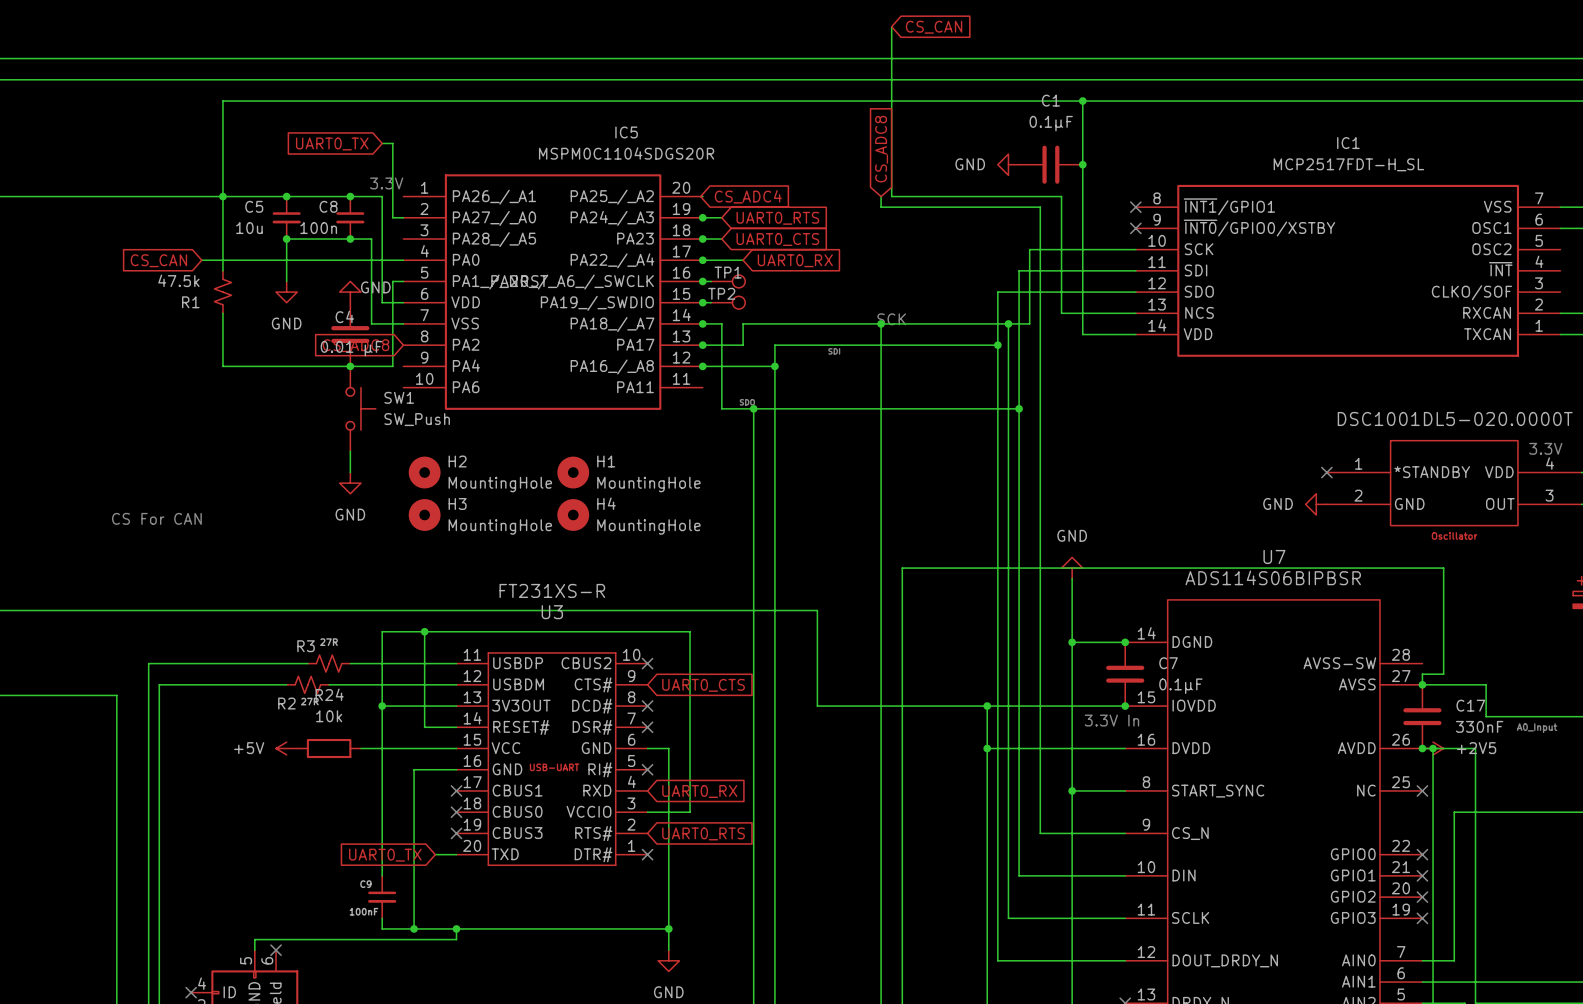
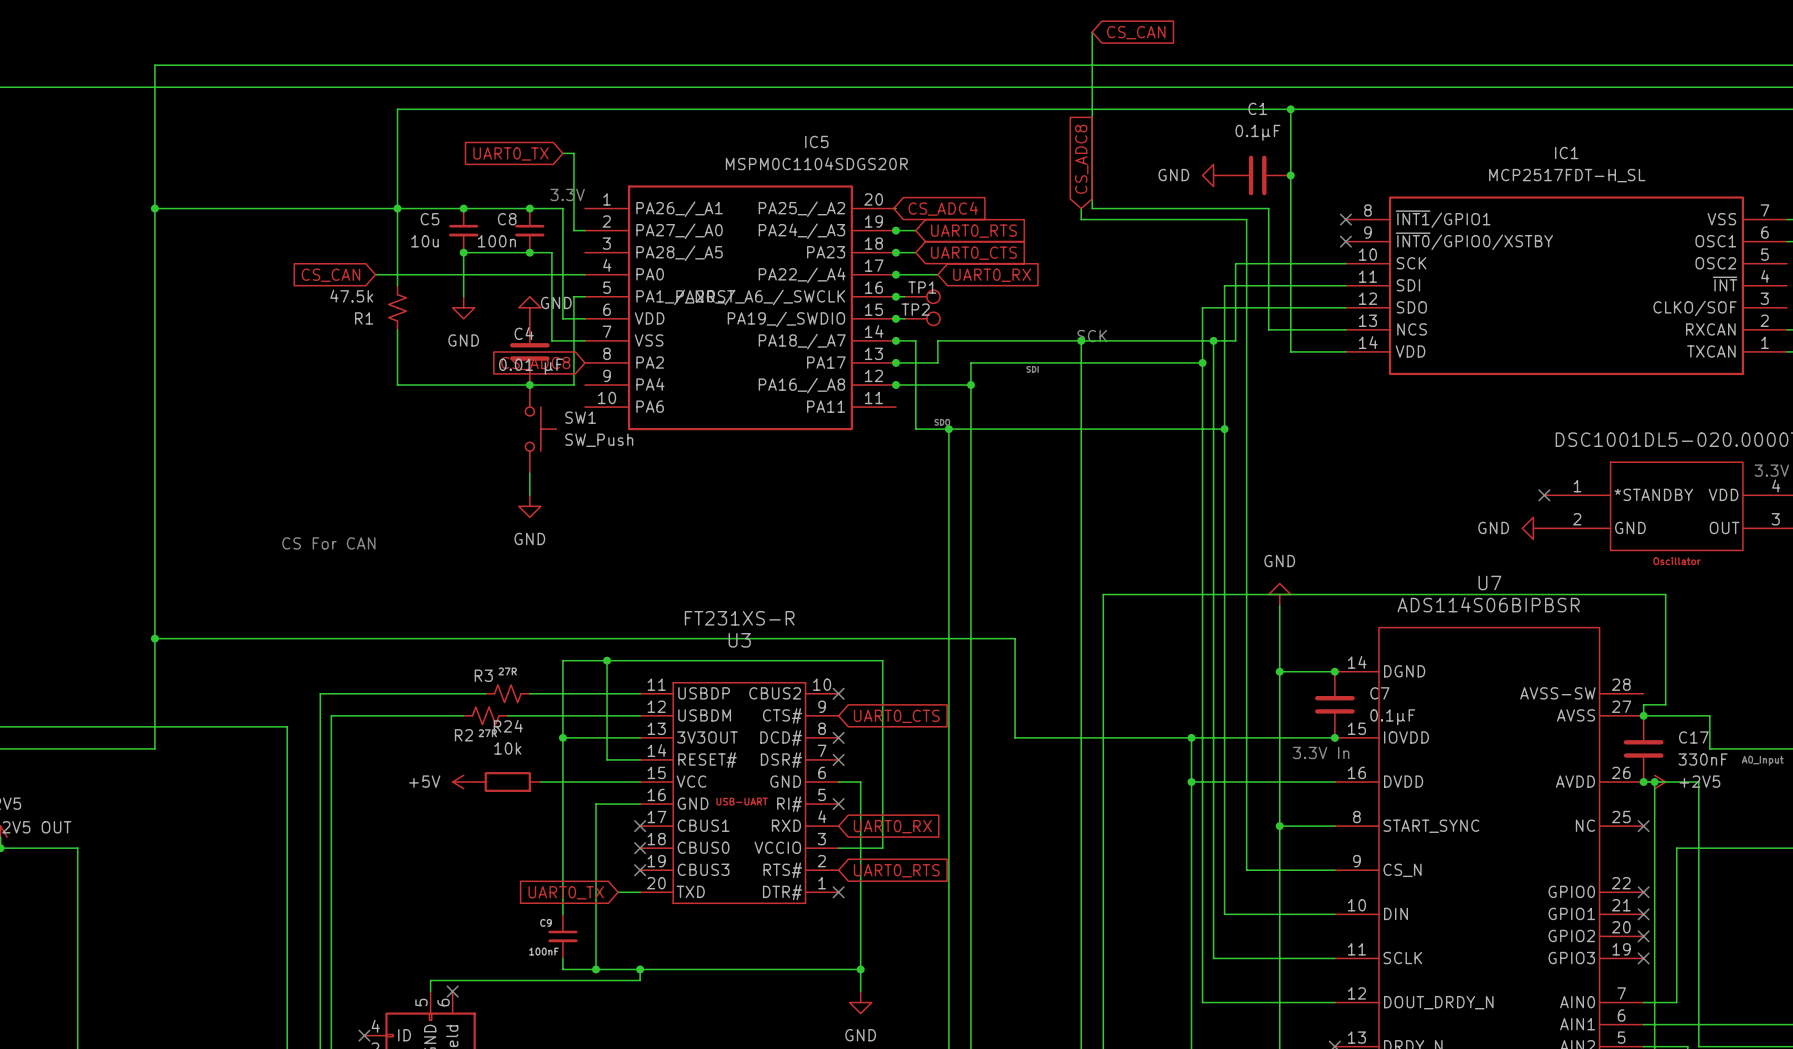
H2: MountingHole (424, 472) -> none
H1: MountingHole (573, 472) -> none
H3: MountingHole (424, 514) -> none
H4: MountingHole (573, 514) -> none

